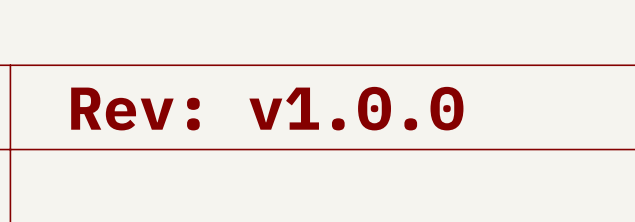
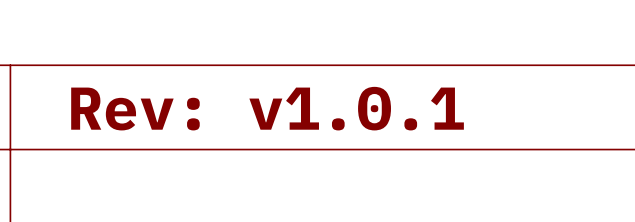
title block: Rev: v1.0.0 (267, 108) -> Rev: v1.0.1 (267, 108)

